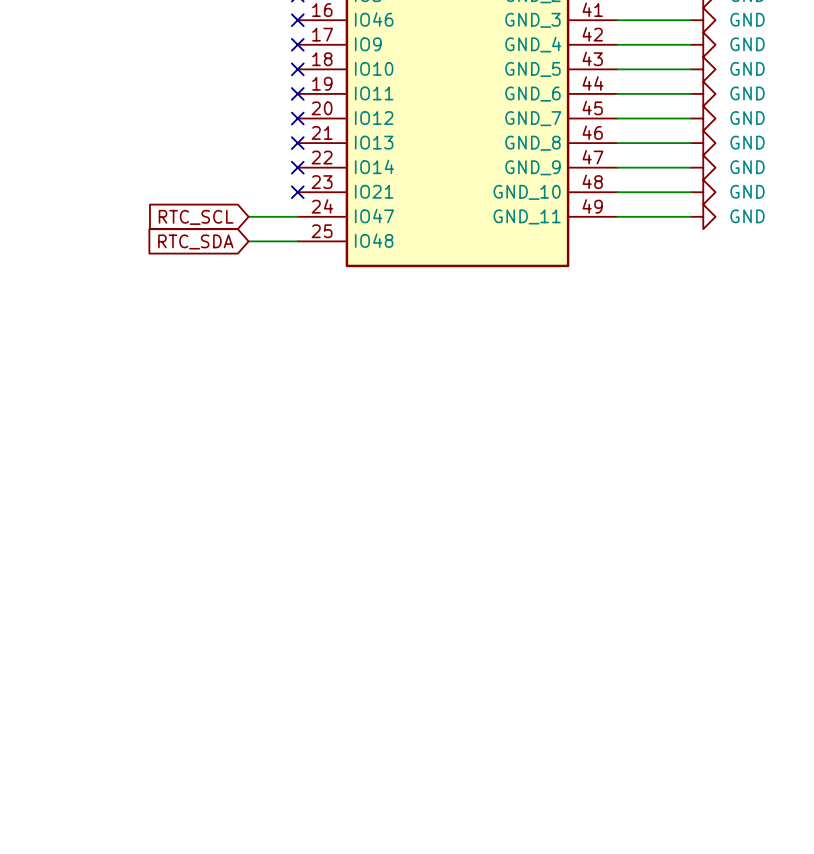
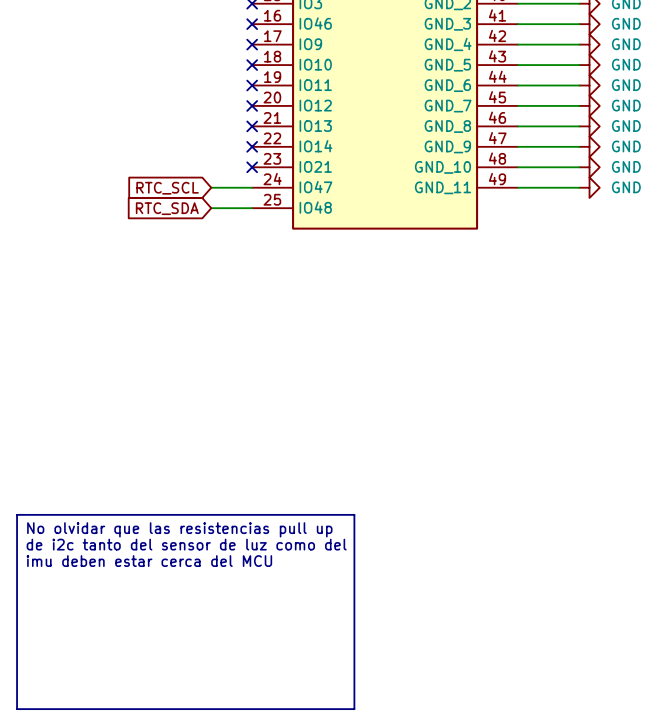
line: none -> (17, 514) (354, 514) (354, 709) (17, 709) (17, 514)
text: none -> No olvidar que las resistencias pull up (179, 529)
text: none -> de i2c tanto del sensor de luz como del (186, 544)
text: none -> imu deben estar cerca del MCU (149, 561)

